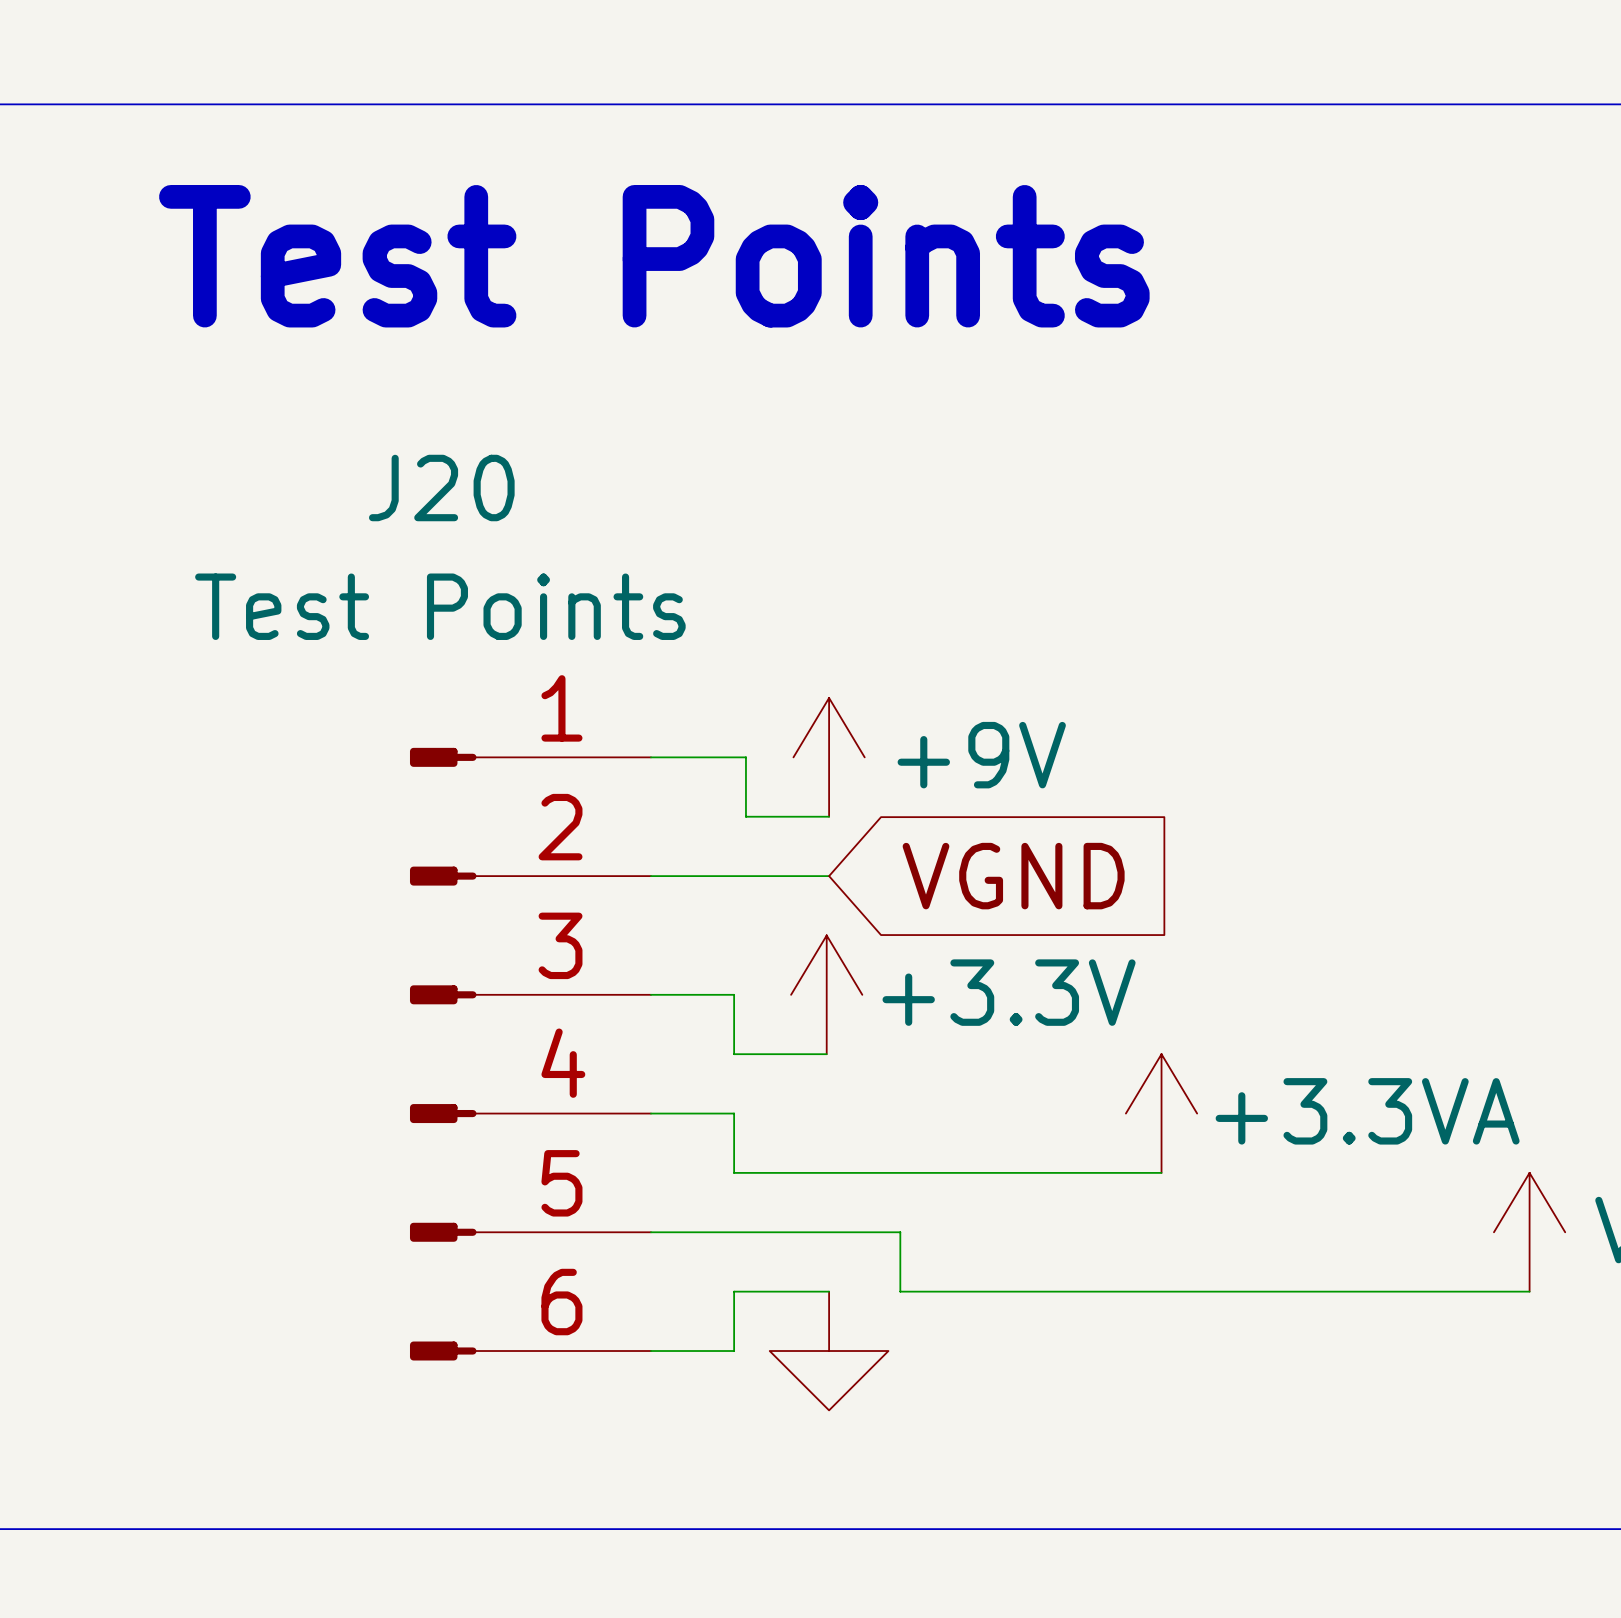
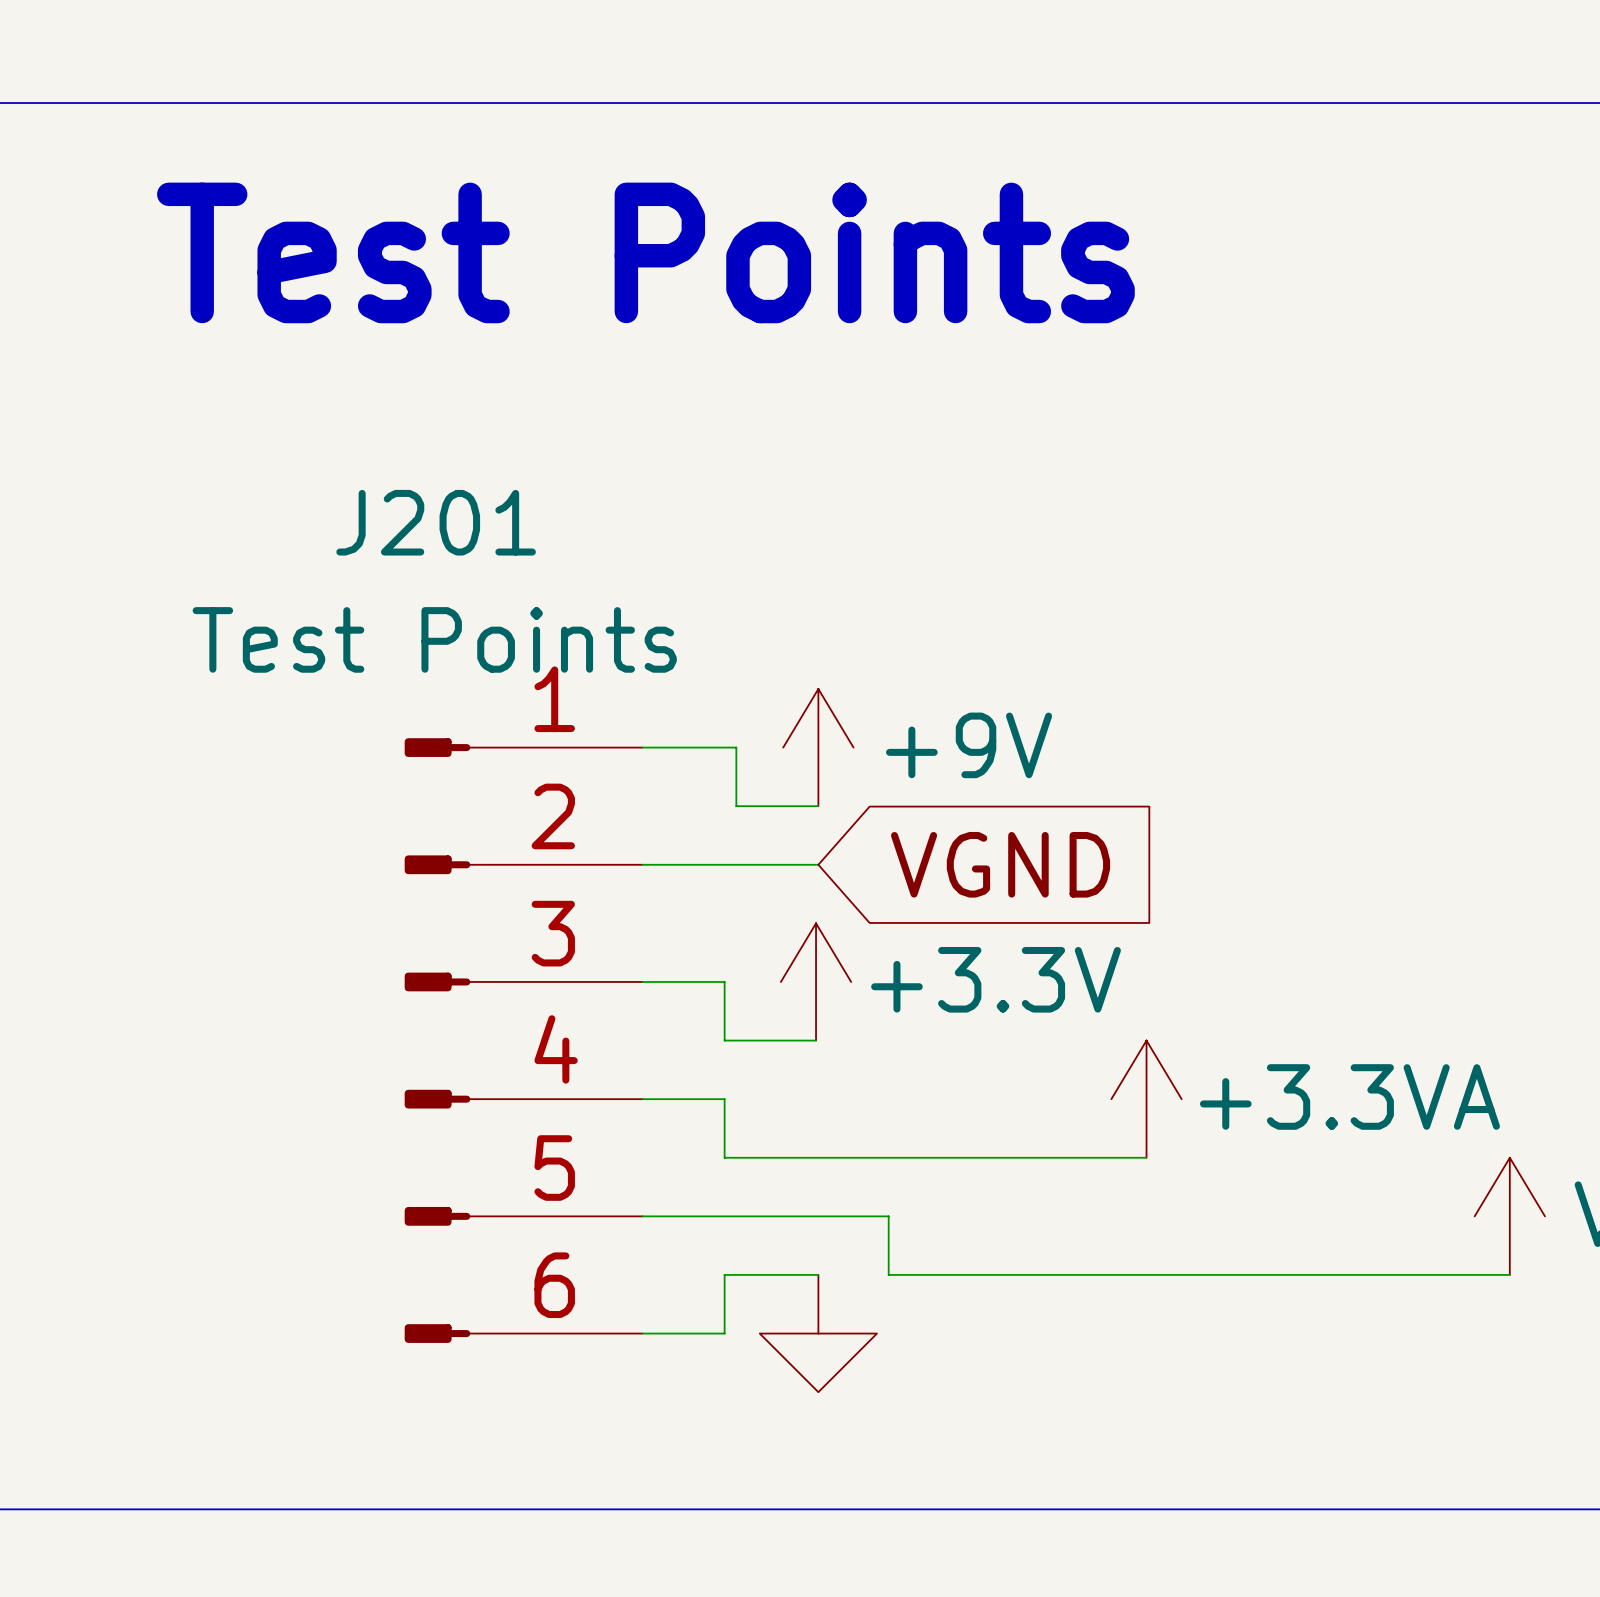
J20 name: J20 (441, 488) -> J201 (436, 522)
J20 value position: Test Points (440, 606) -> Test Points (434, 639)

